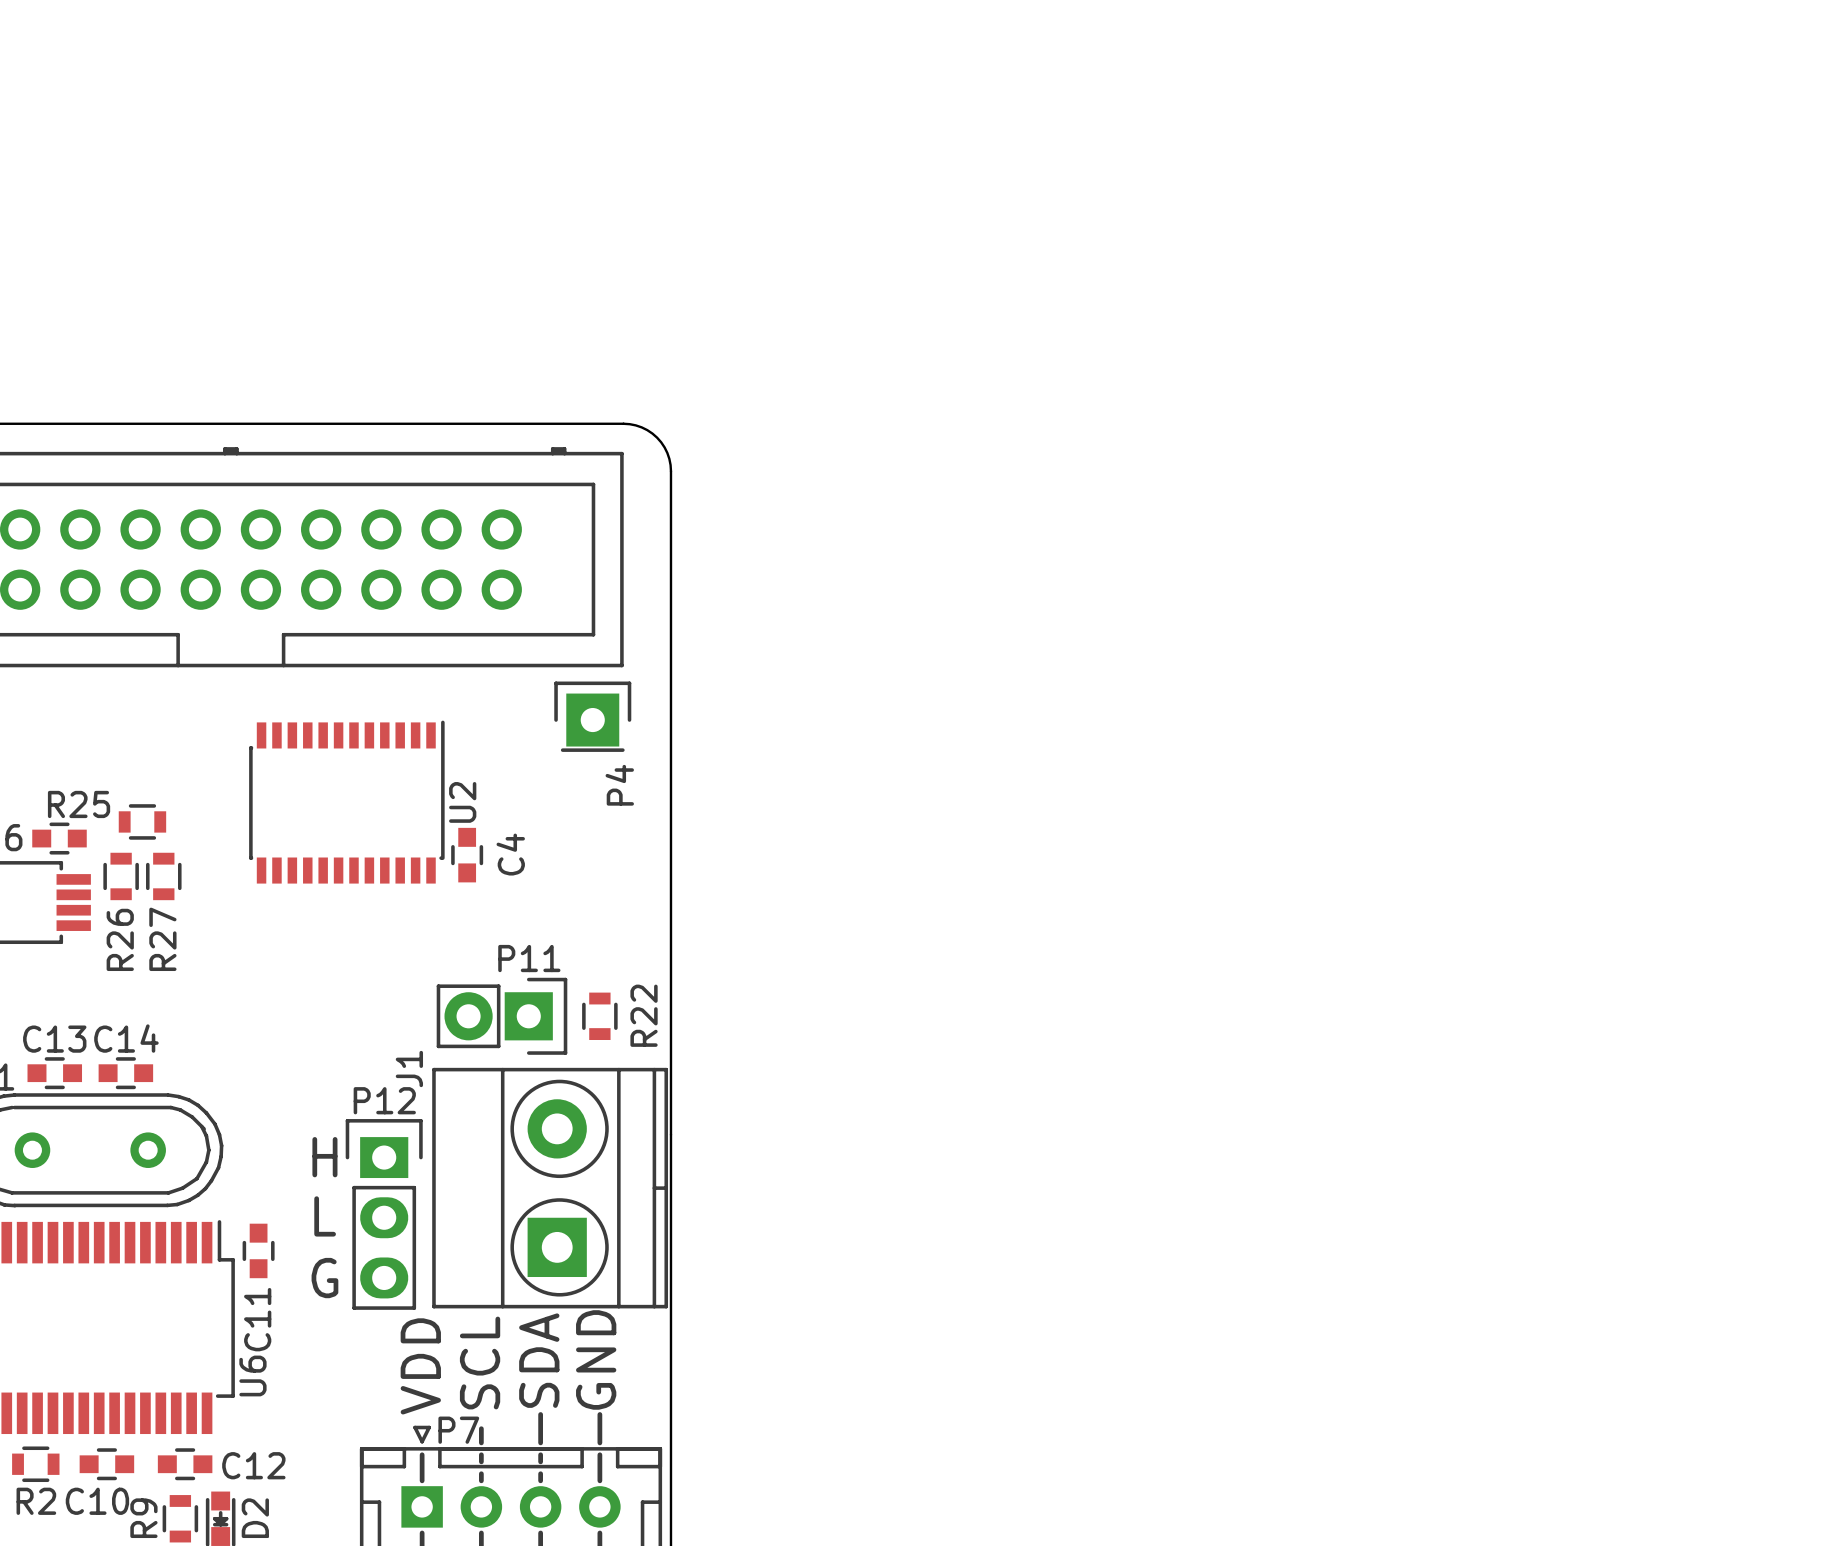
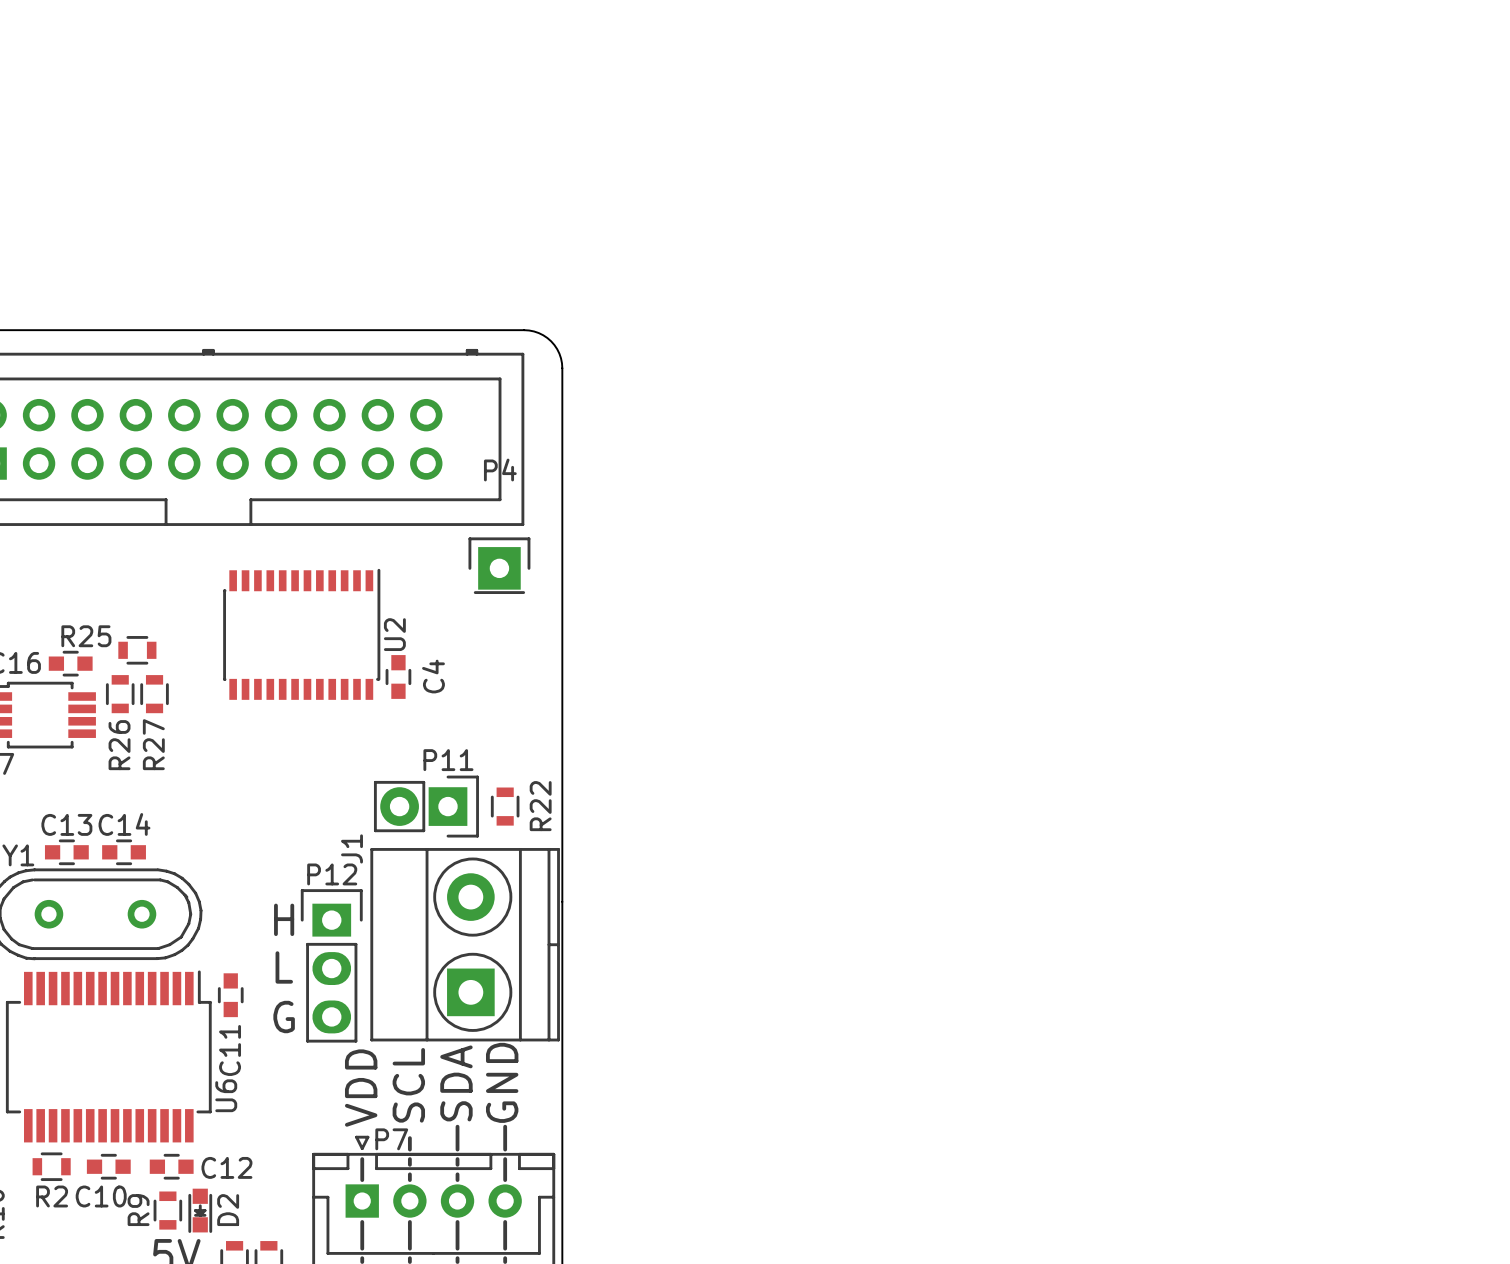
P4 name rotation: 0° (619, 785) -> 90° clockwise (500, 470)
P4 name position: P4 (619, 785) -> P4 (500, 470)

